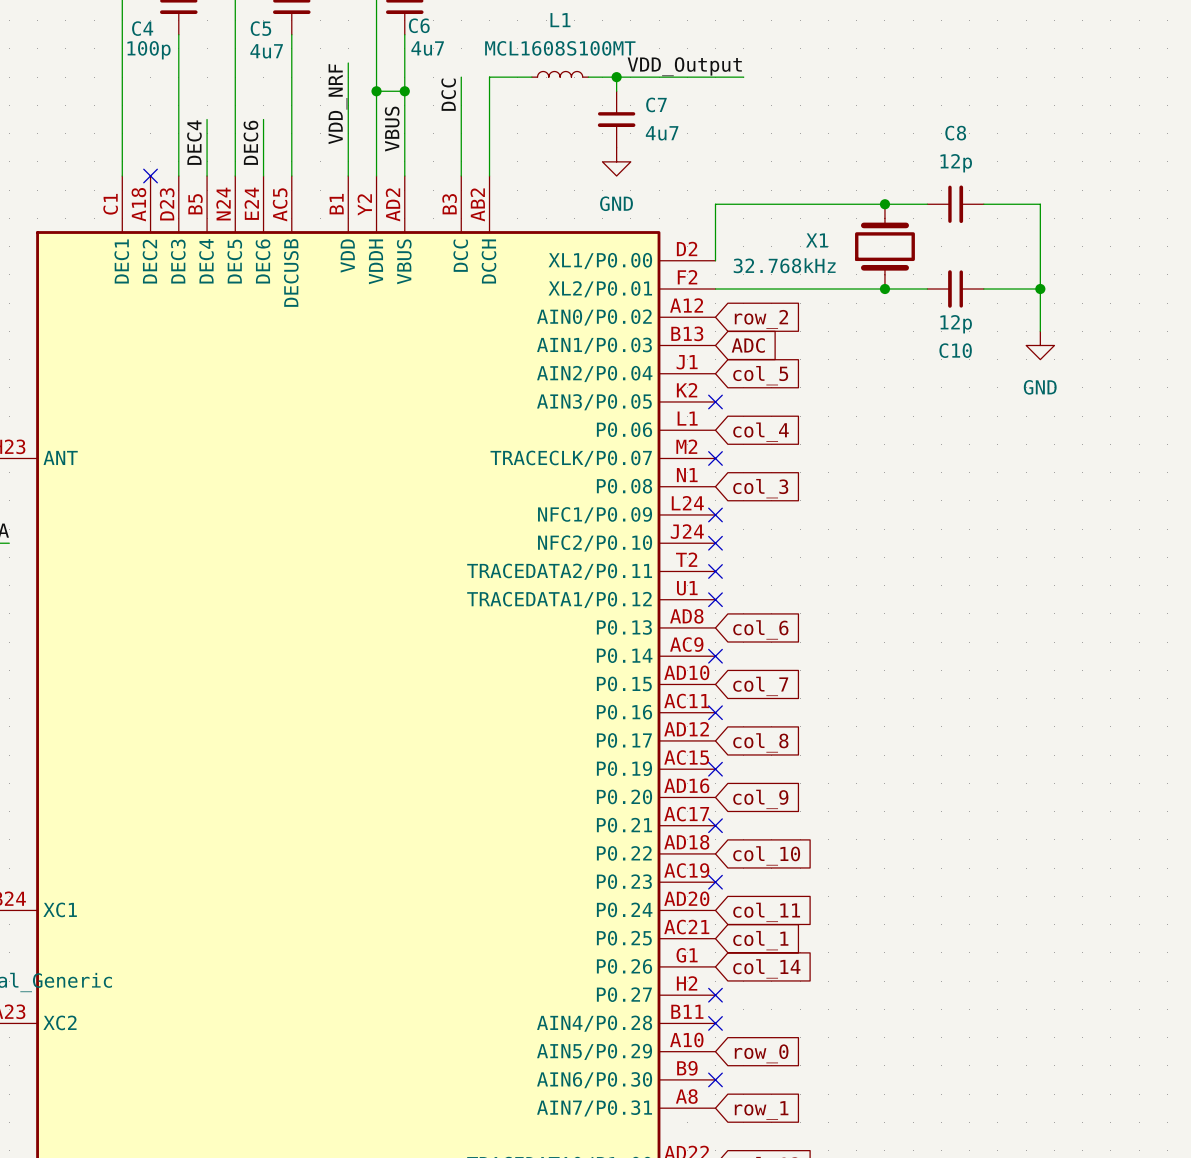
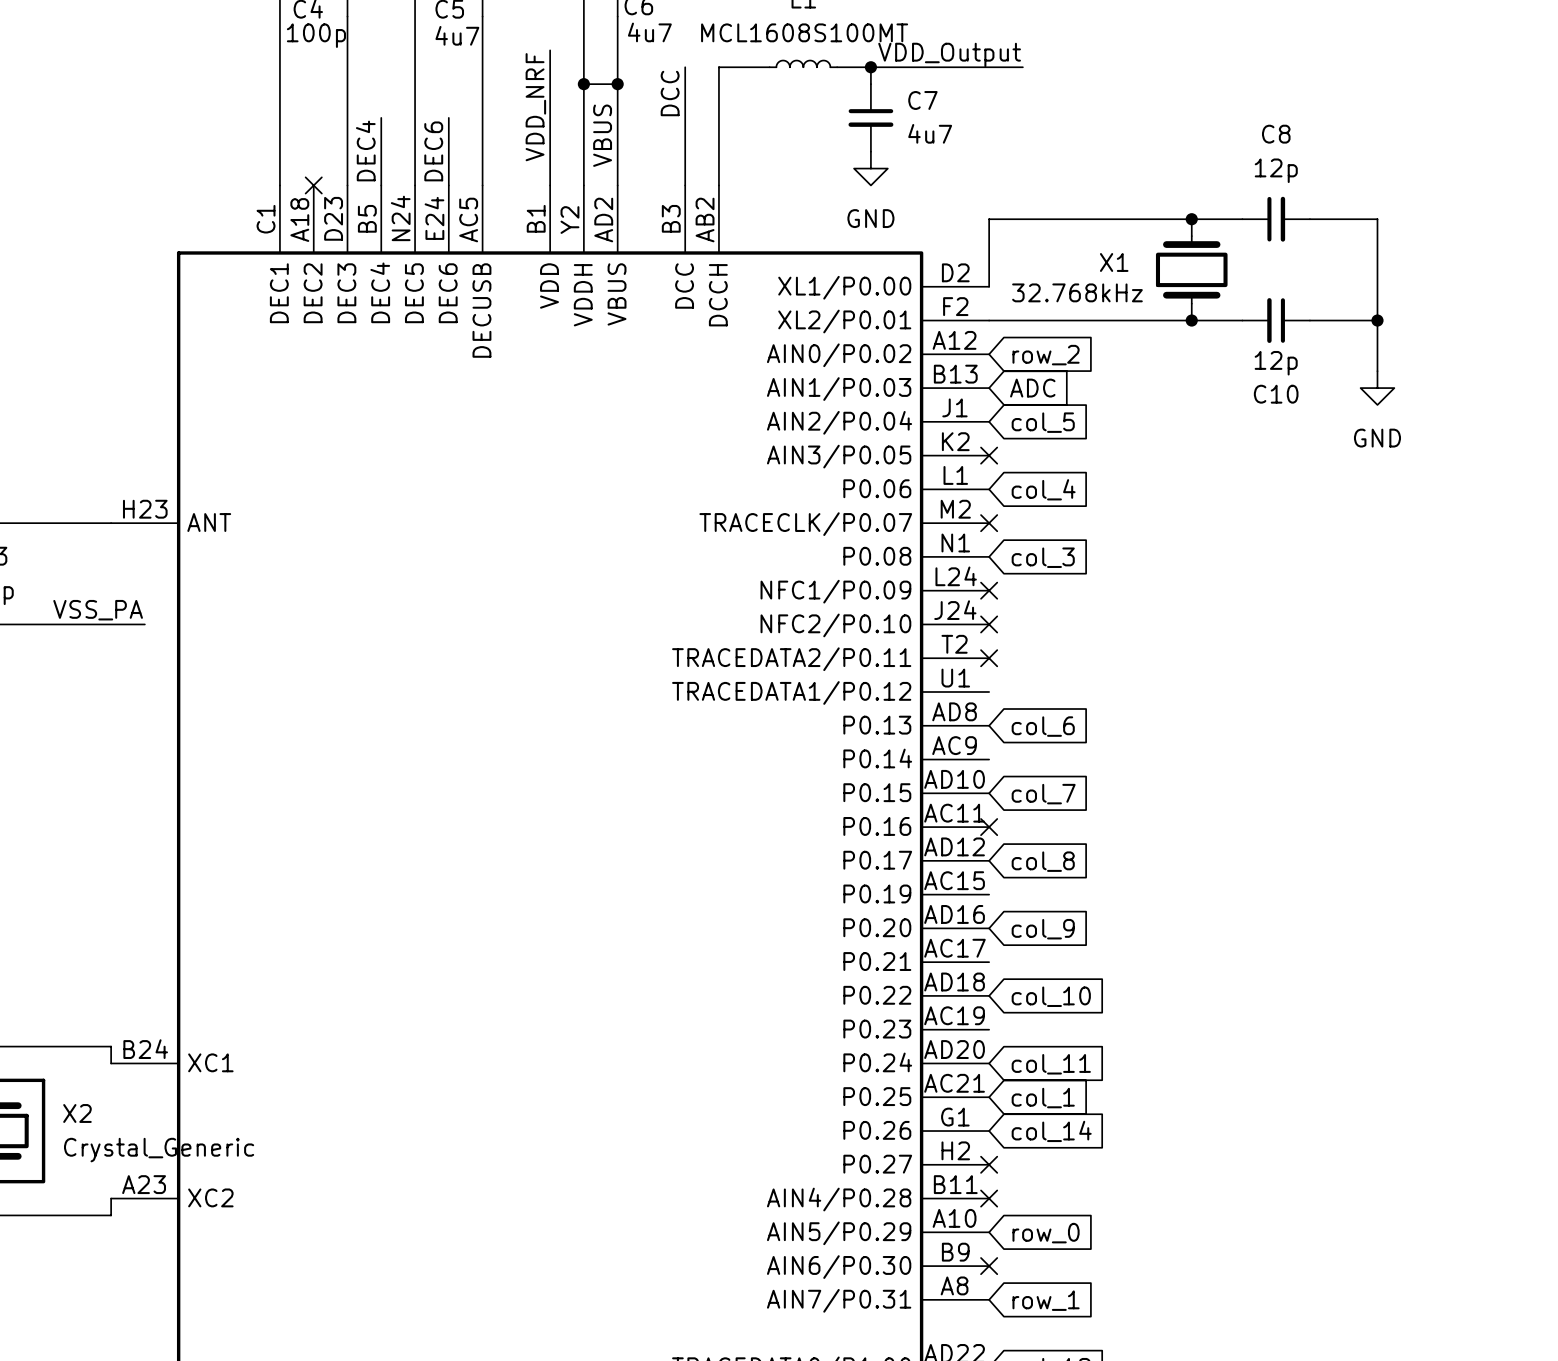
no-connect mark: (715, 599) -> none
no-connect mark: (715, 656) -> none
no-connect mark: (715, 769) -> none
no-connect mark: (715, 825) -> none
no-connect mark: (715, 882) -> none

